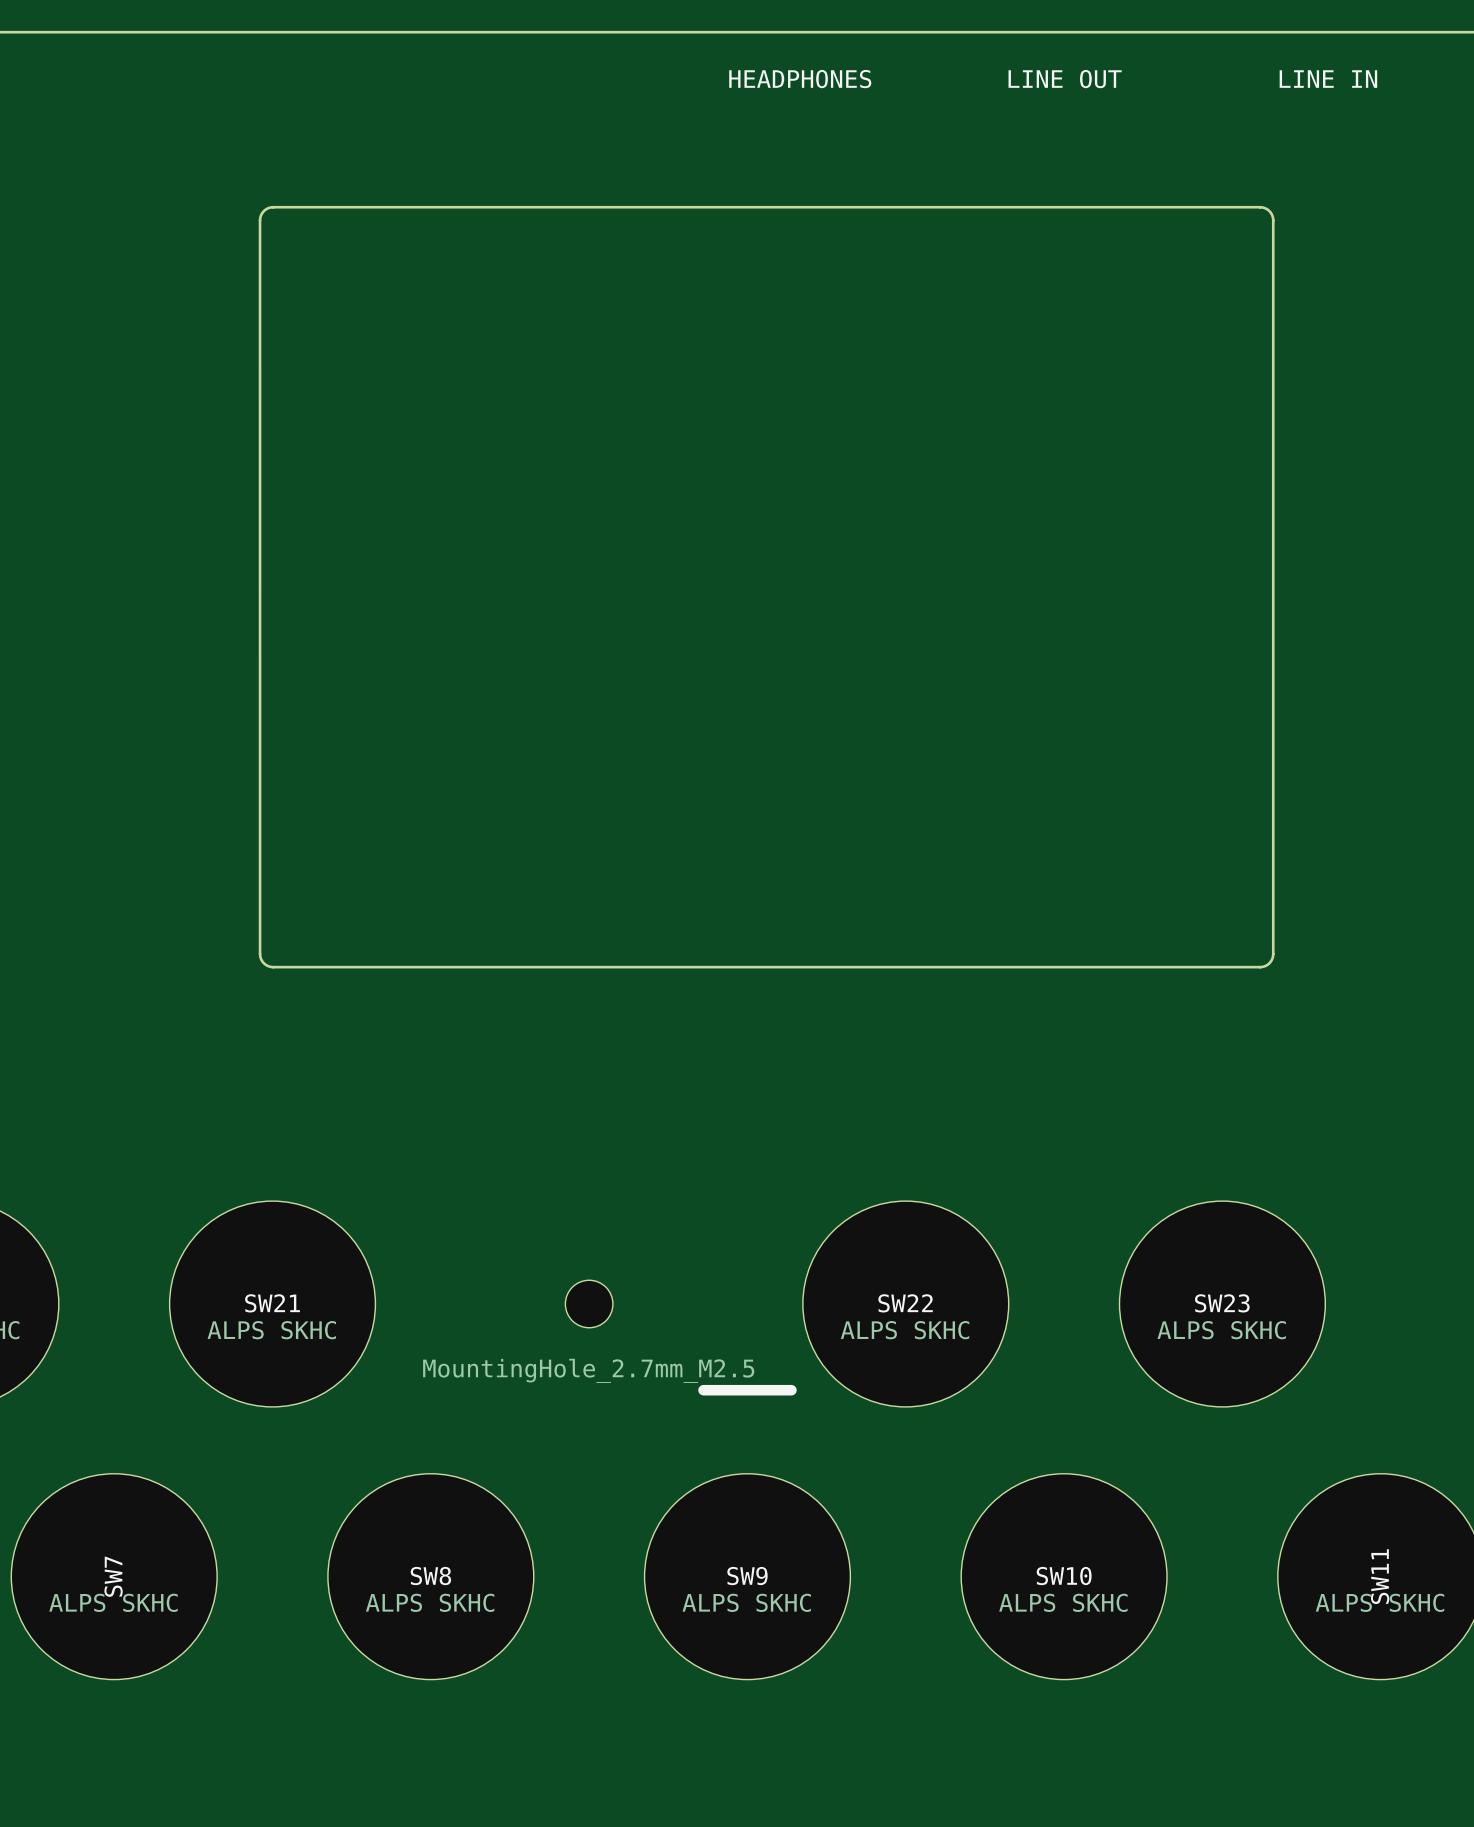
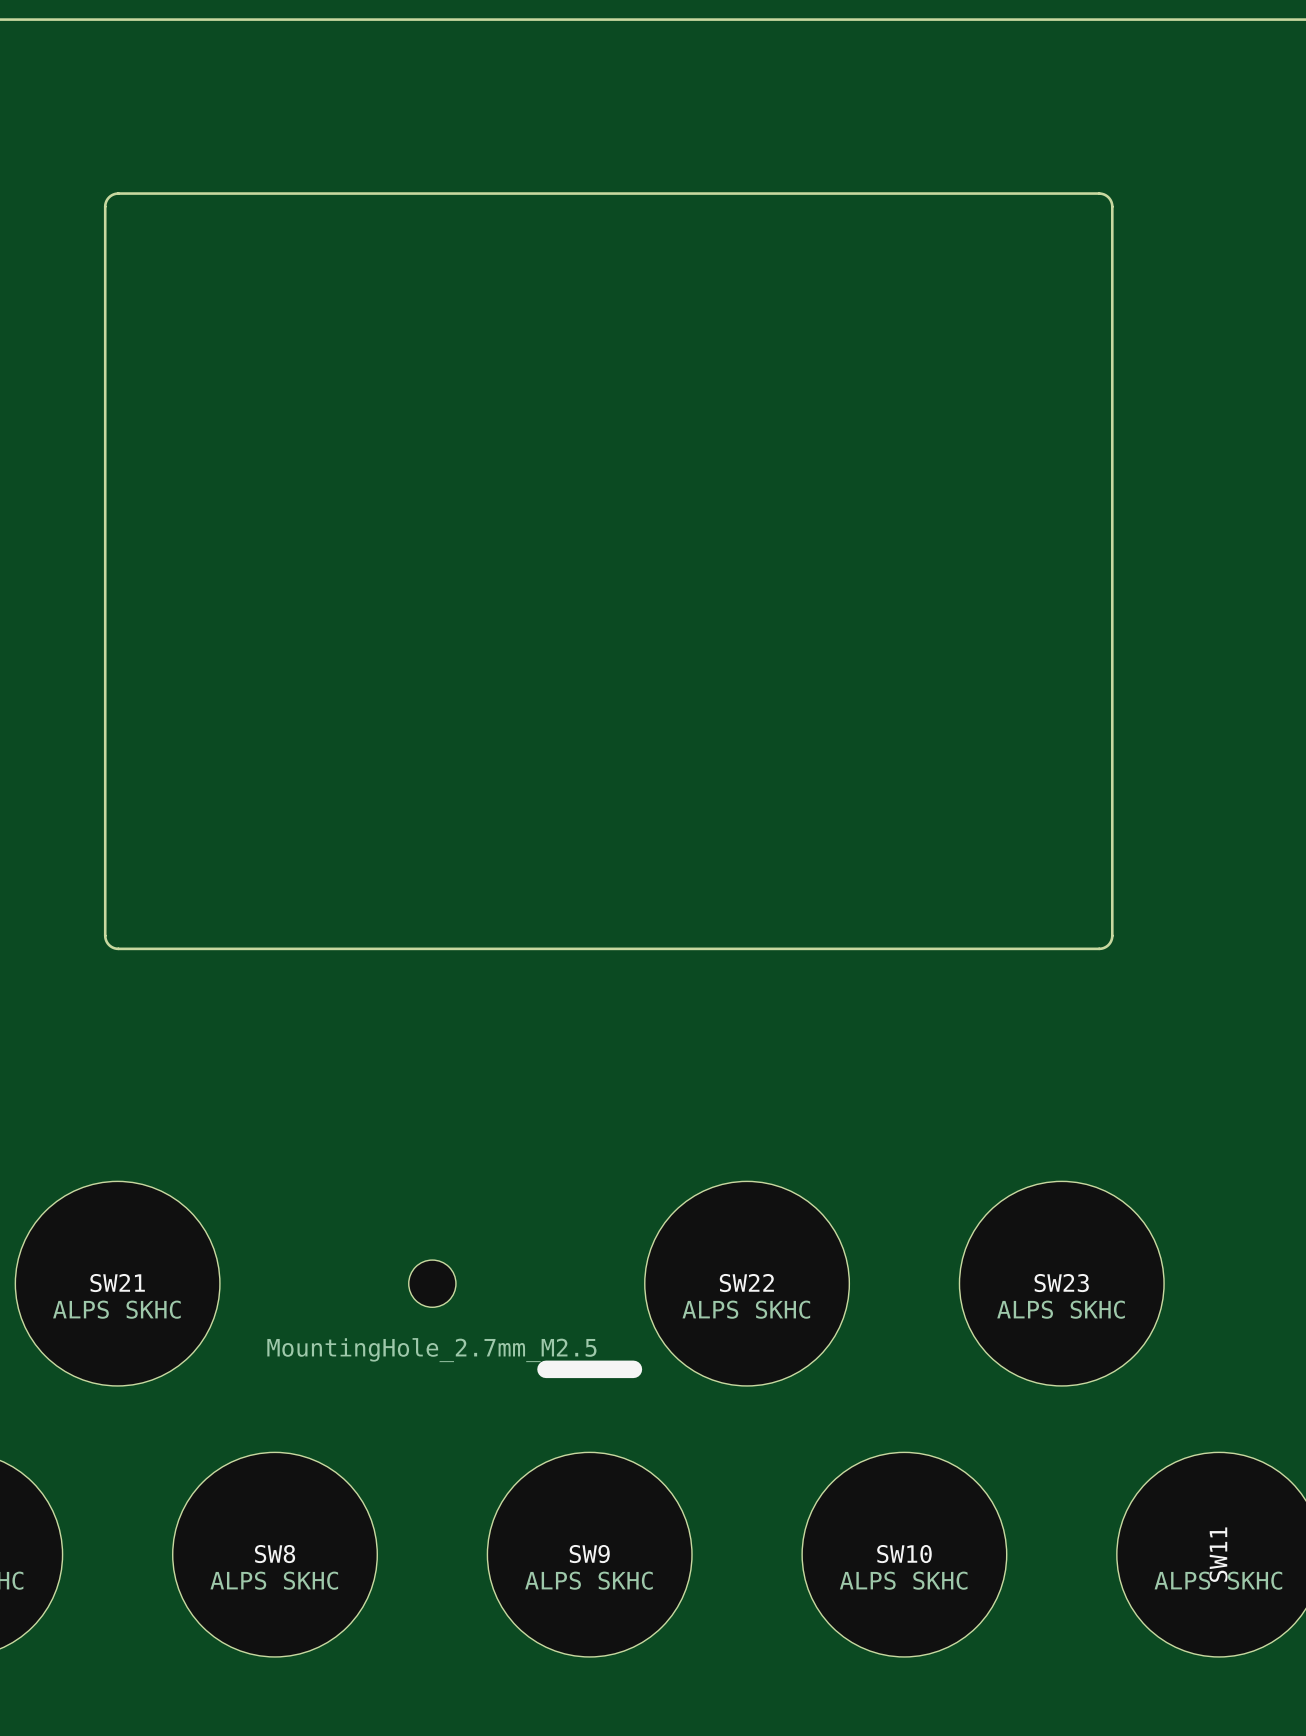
text: HEADPHONES (800, 79) -> none
text: LINE OUT (1065, 79) -> none
text: LINE IN (1328, 79) -> none
line width: thin (703, 1390) (791, 1390) -> thick (545, 1369) (633, 1369)

